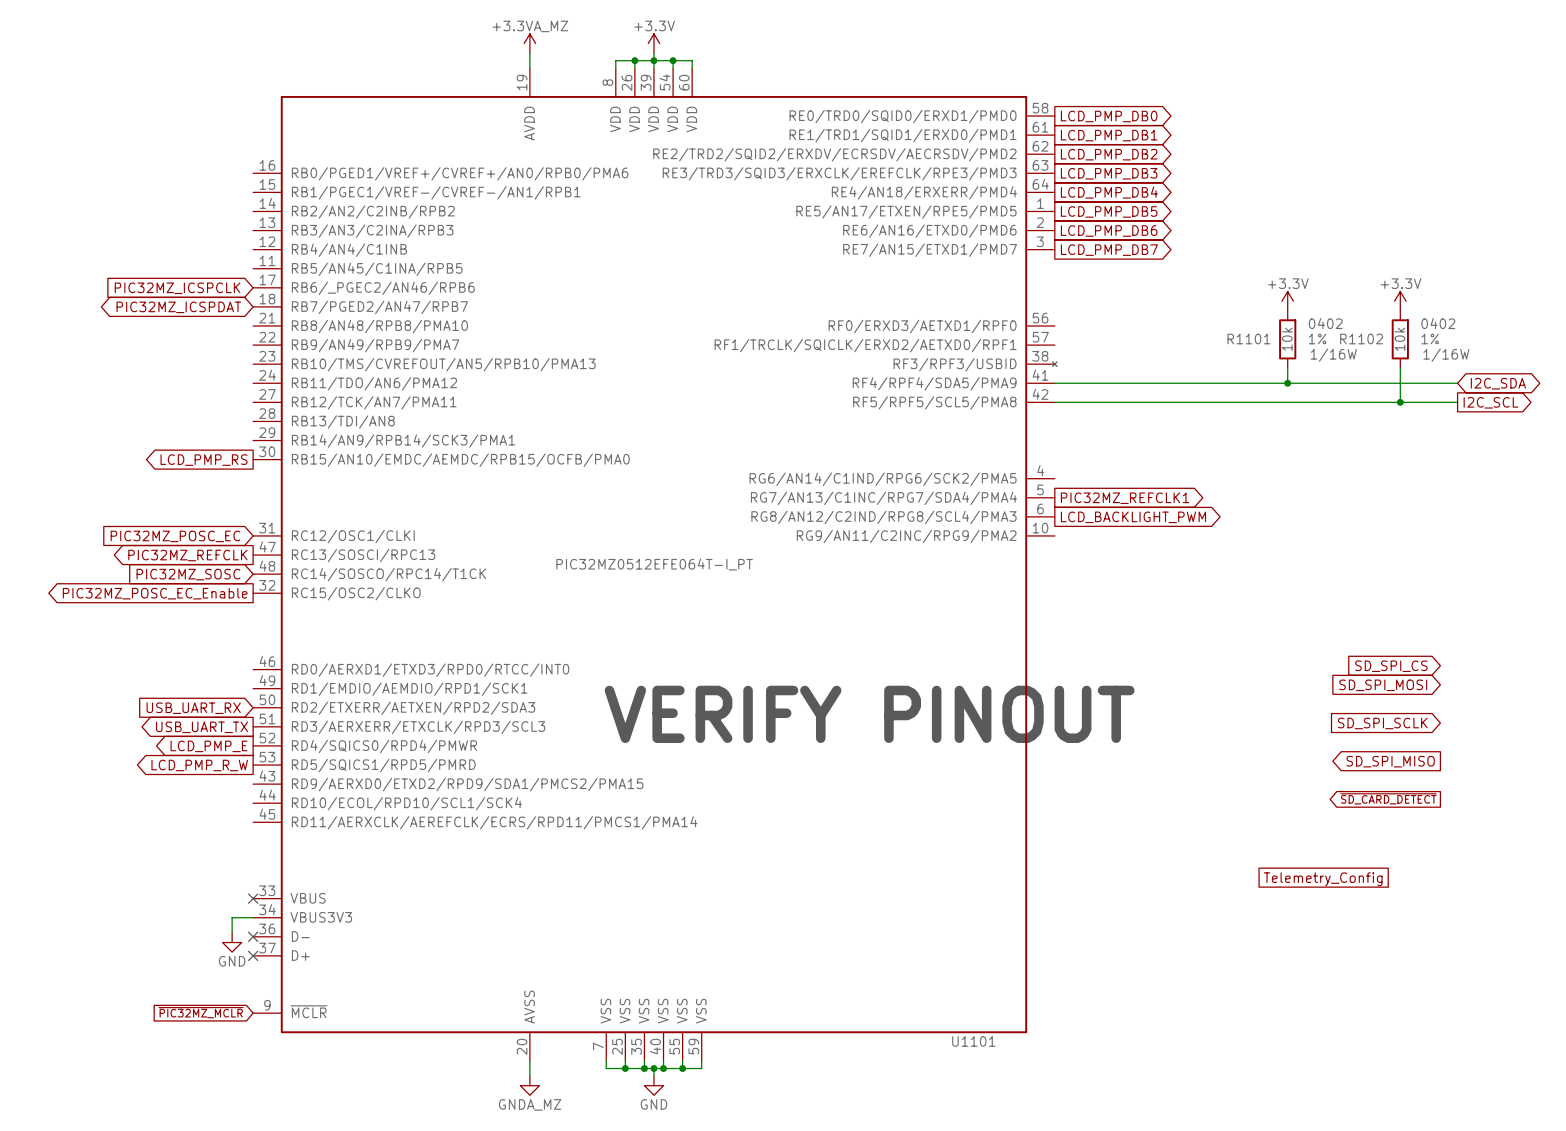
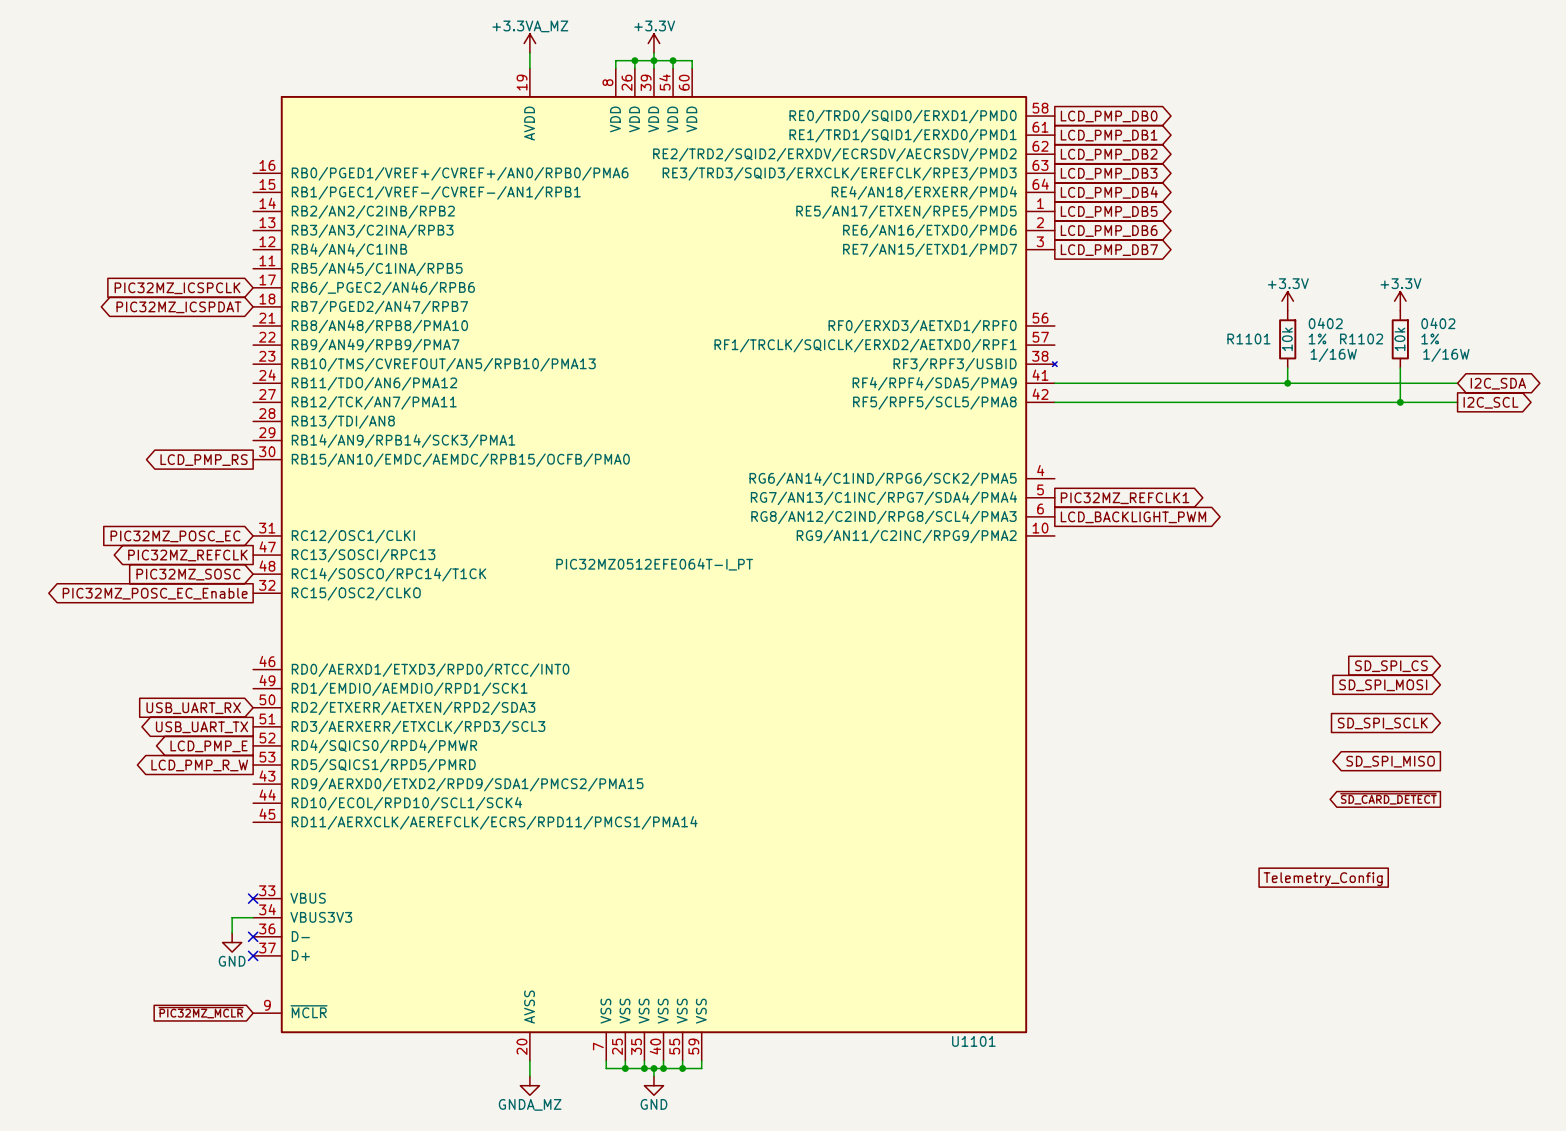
text: VERIFY PINOUT (869, 714) -> none

